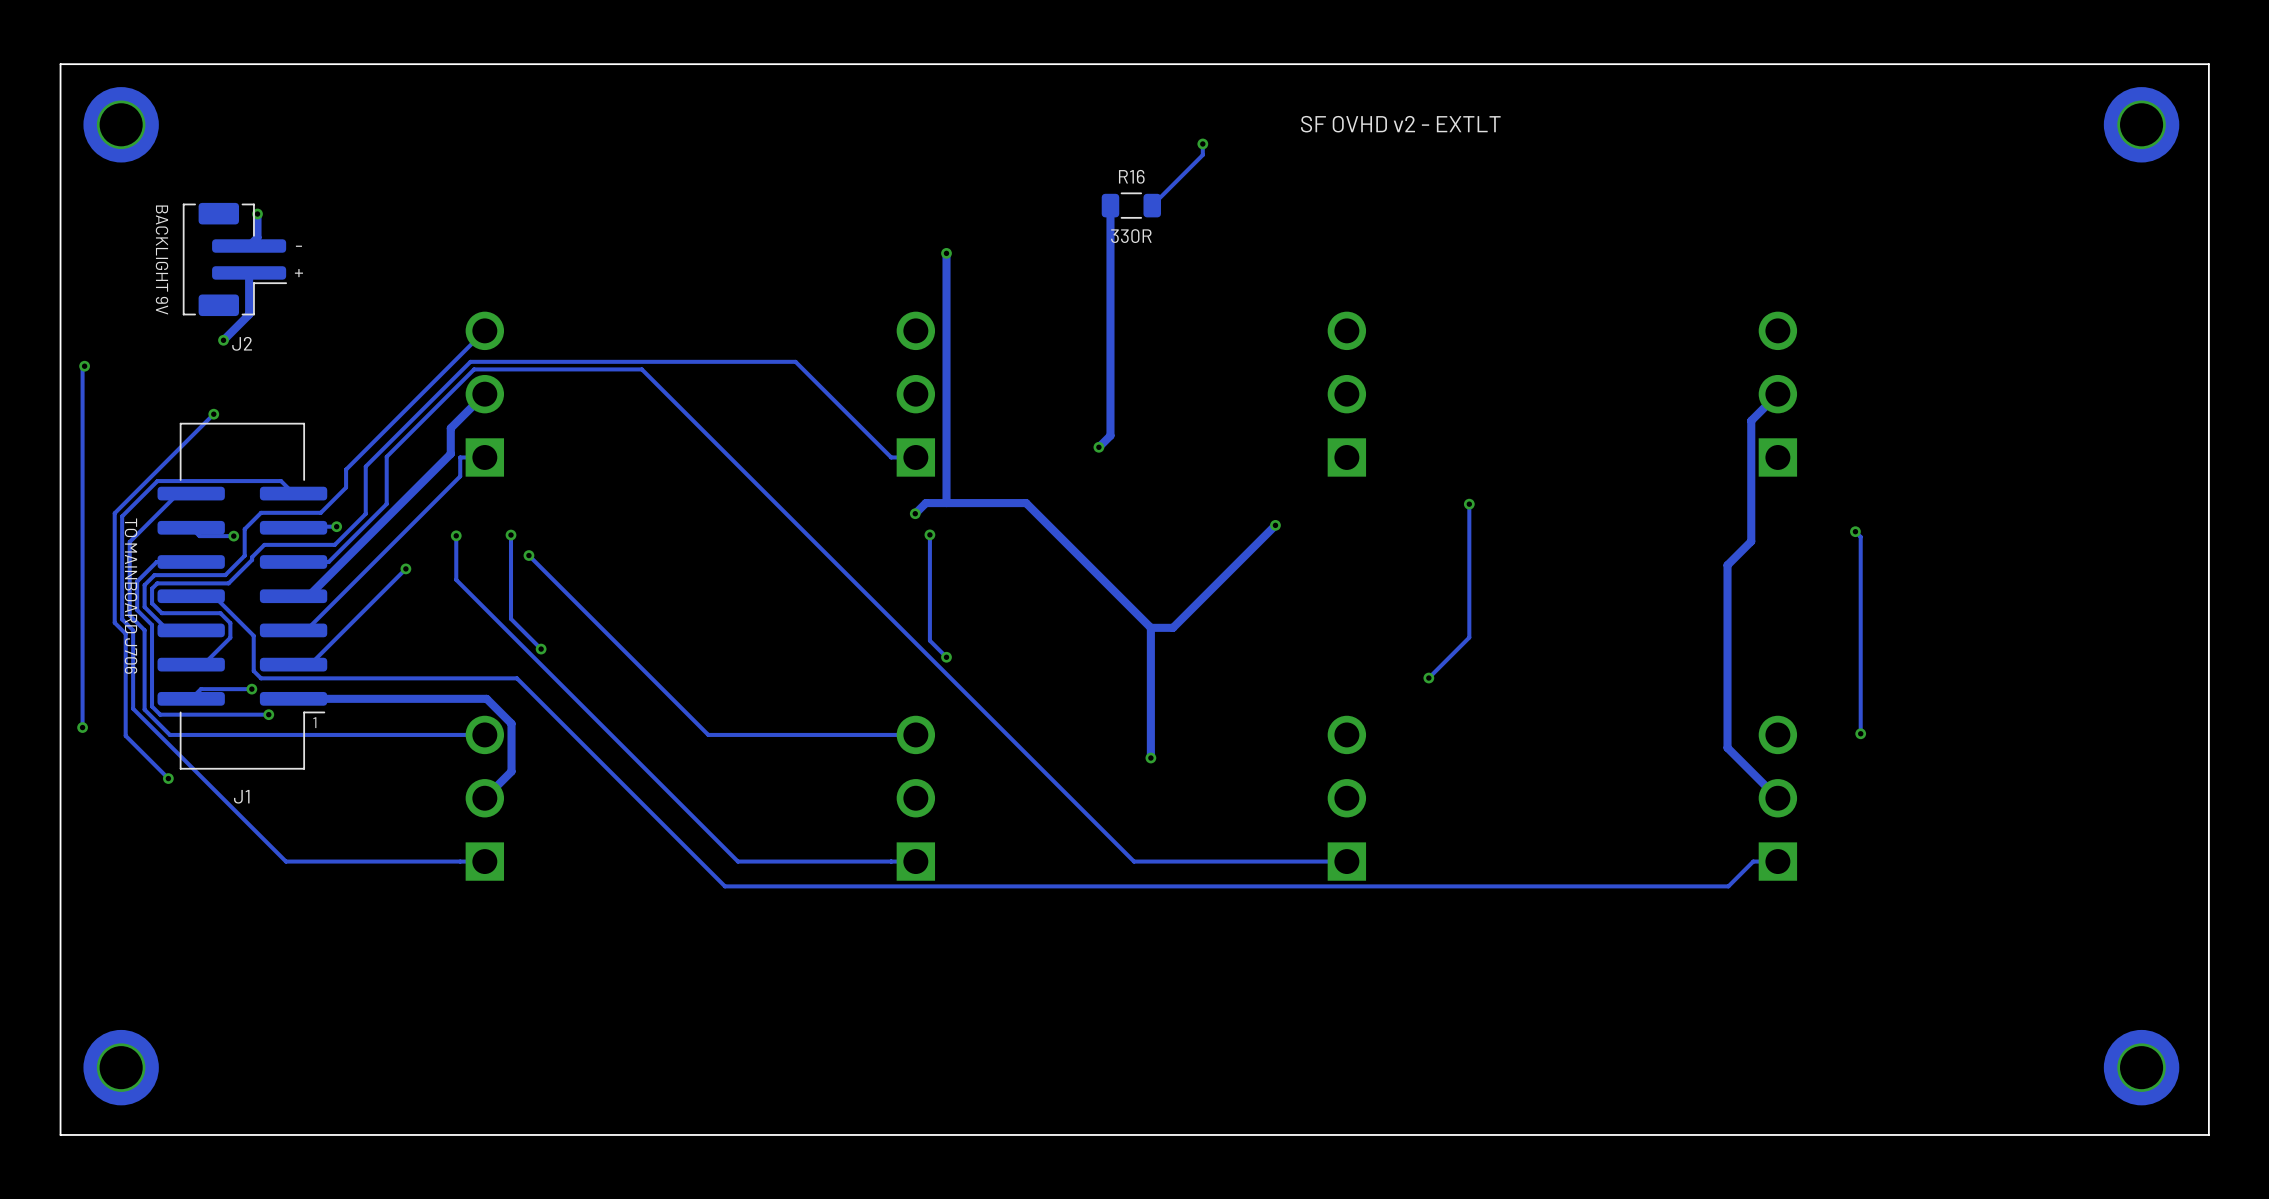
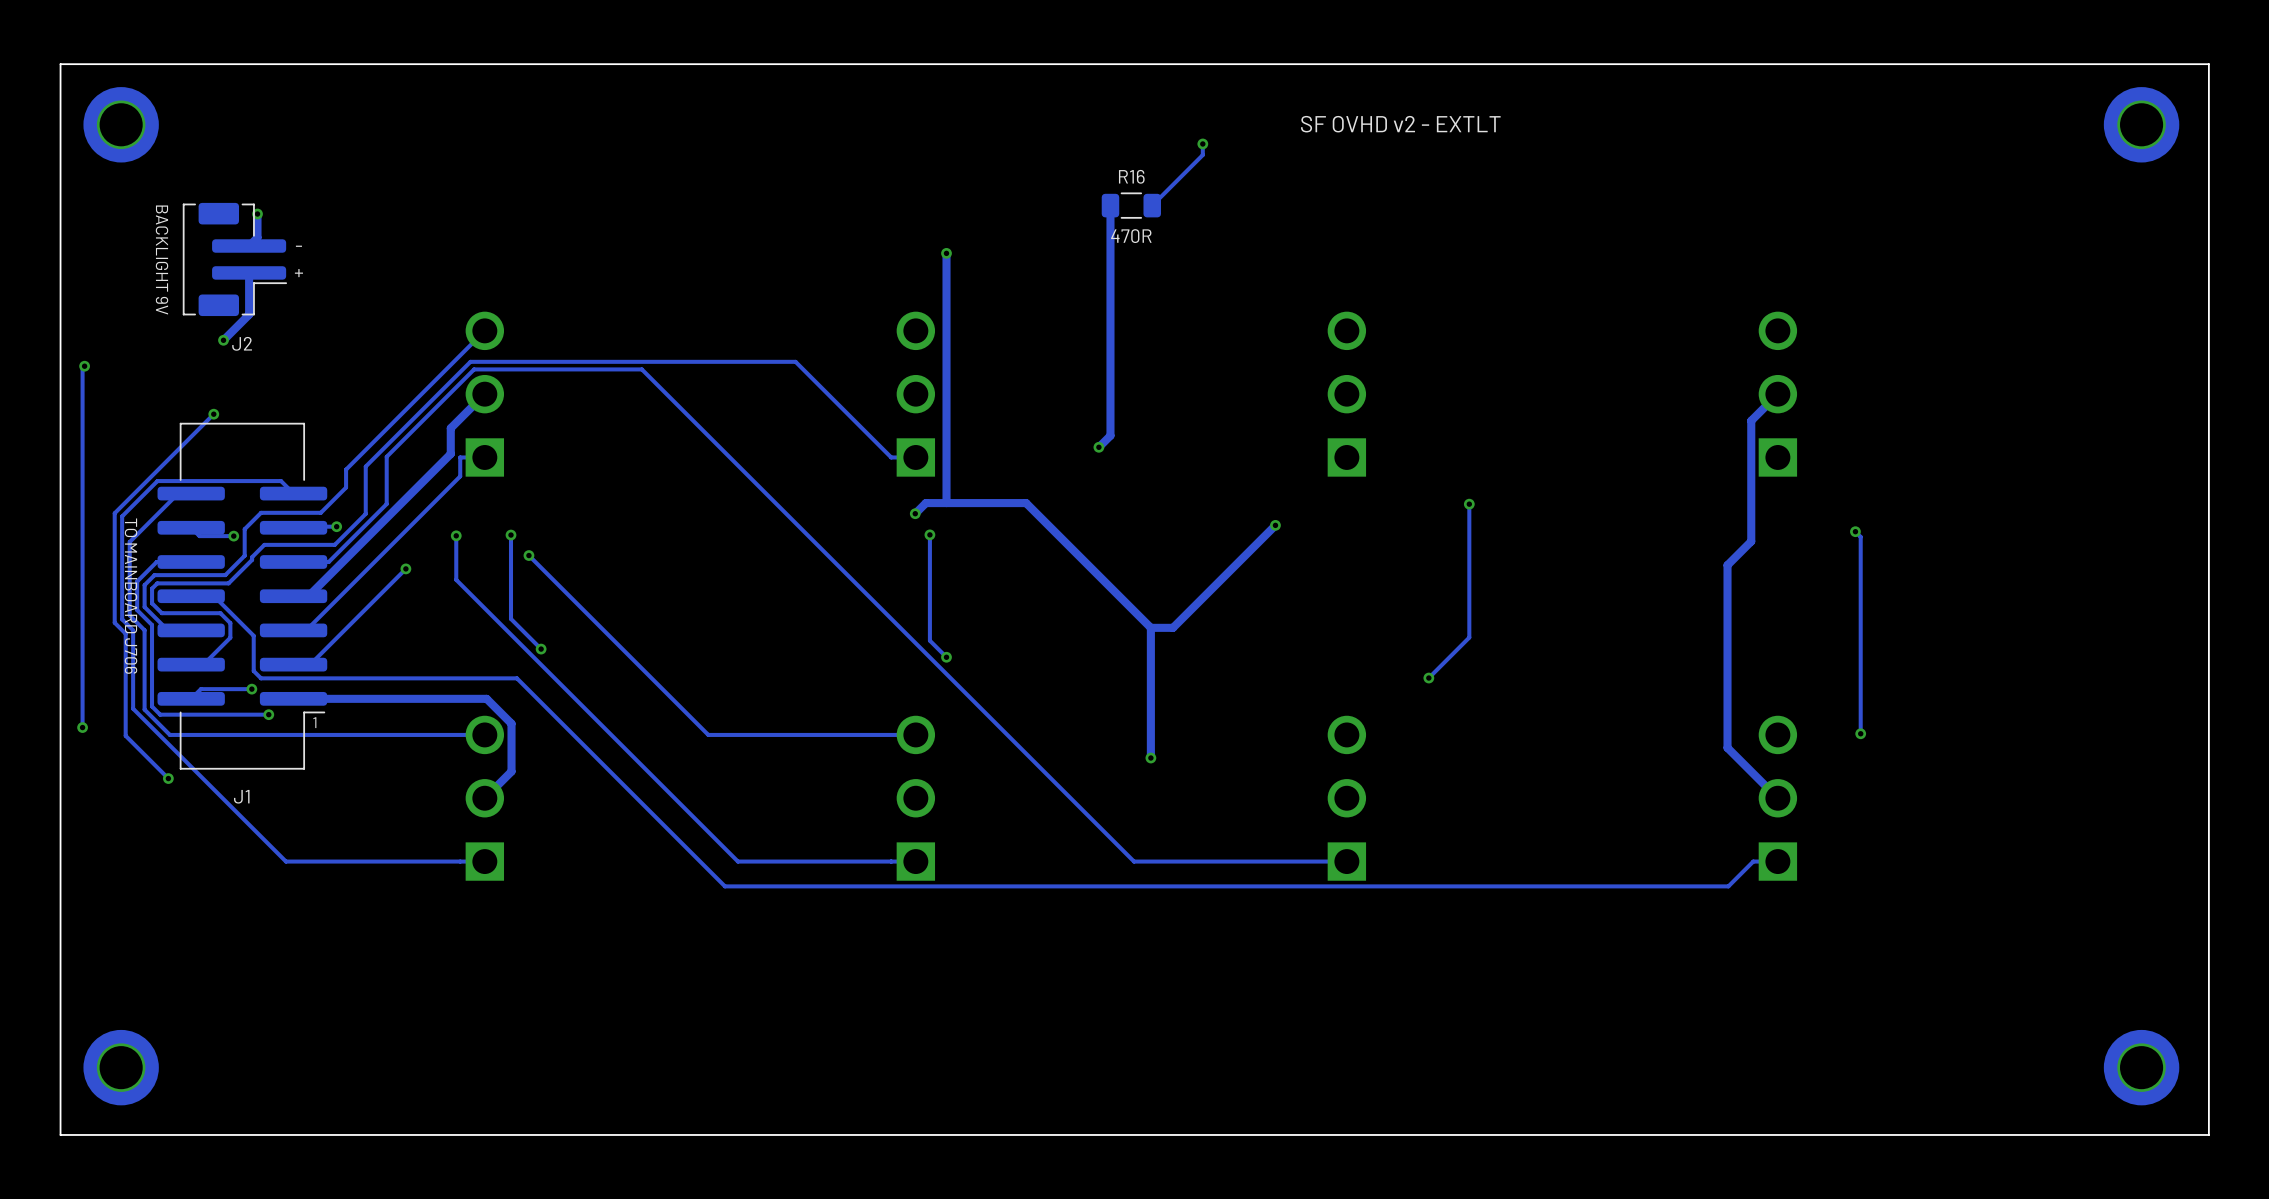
R16 text: 330R (1131, 236) -> 470R (1131, 236)

